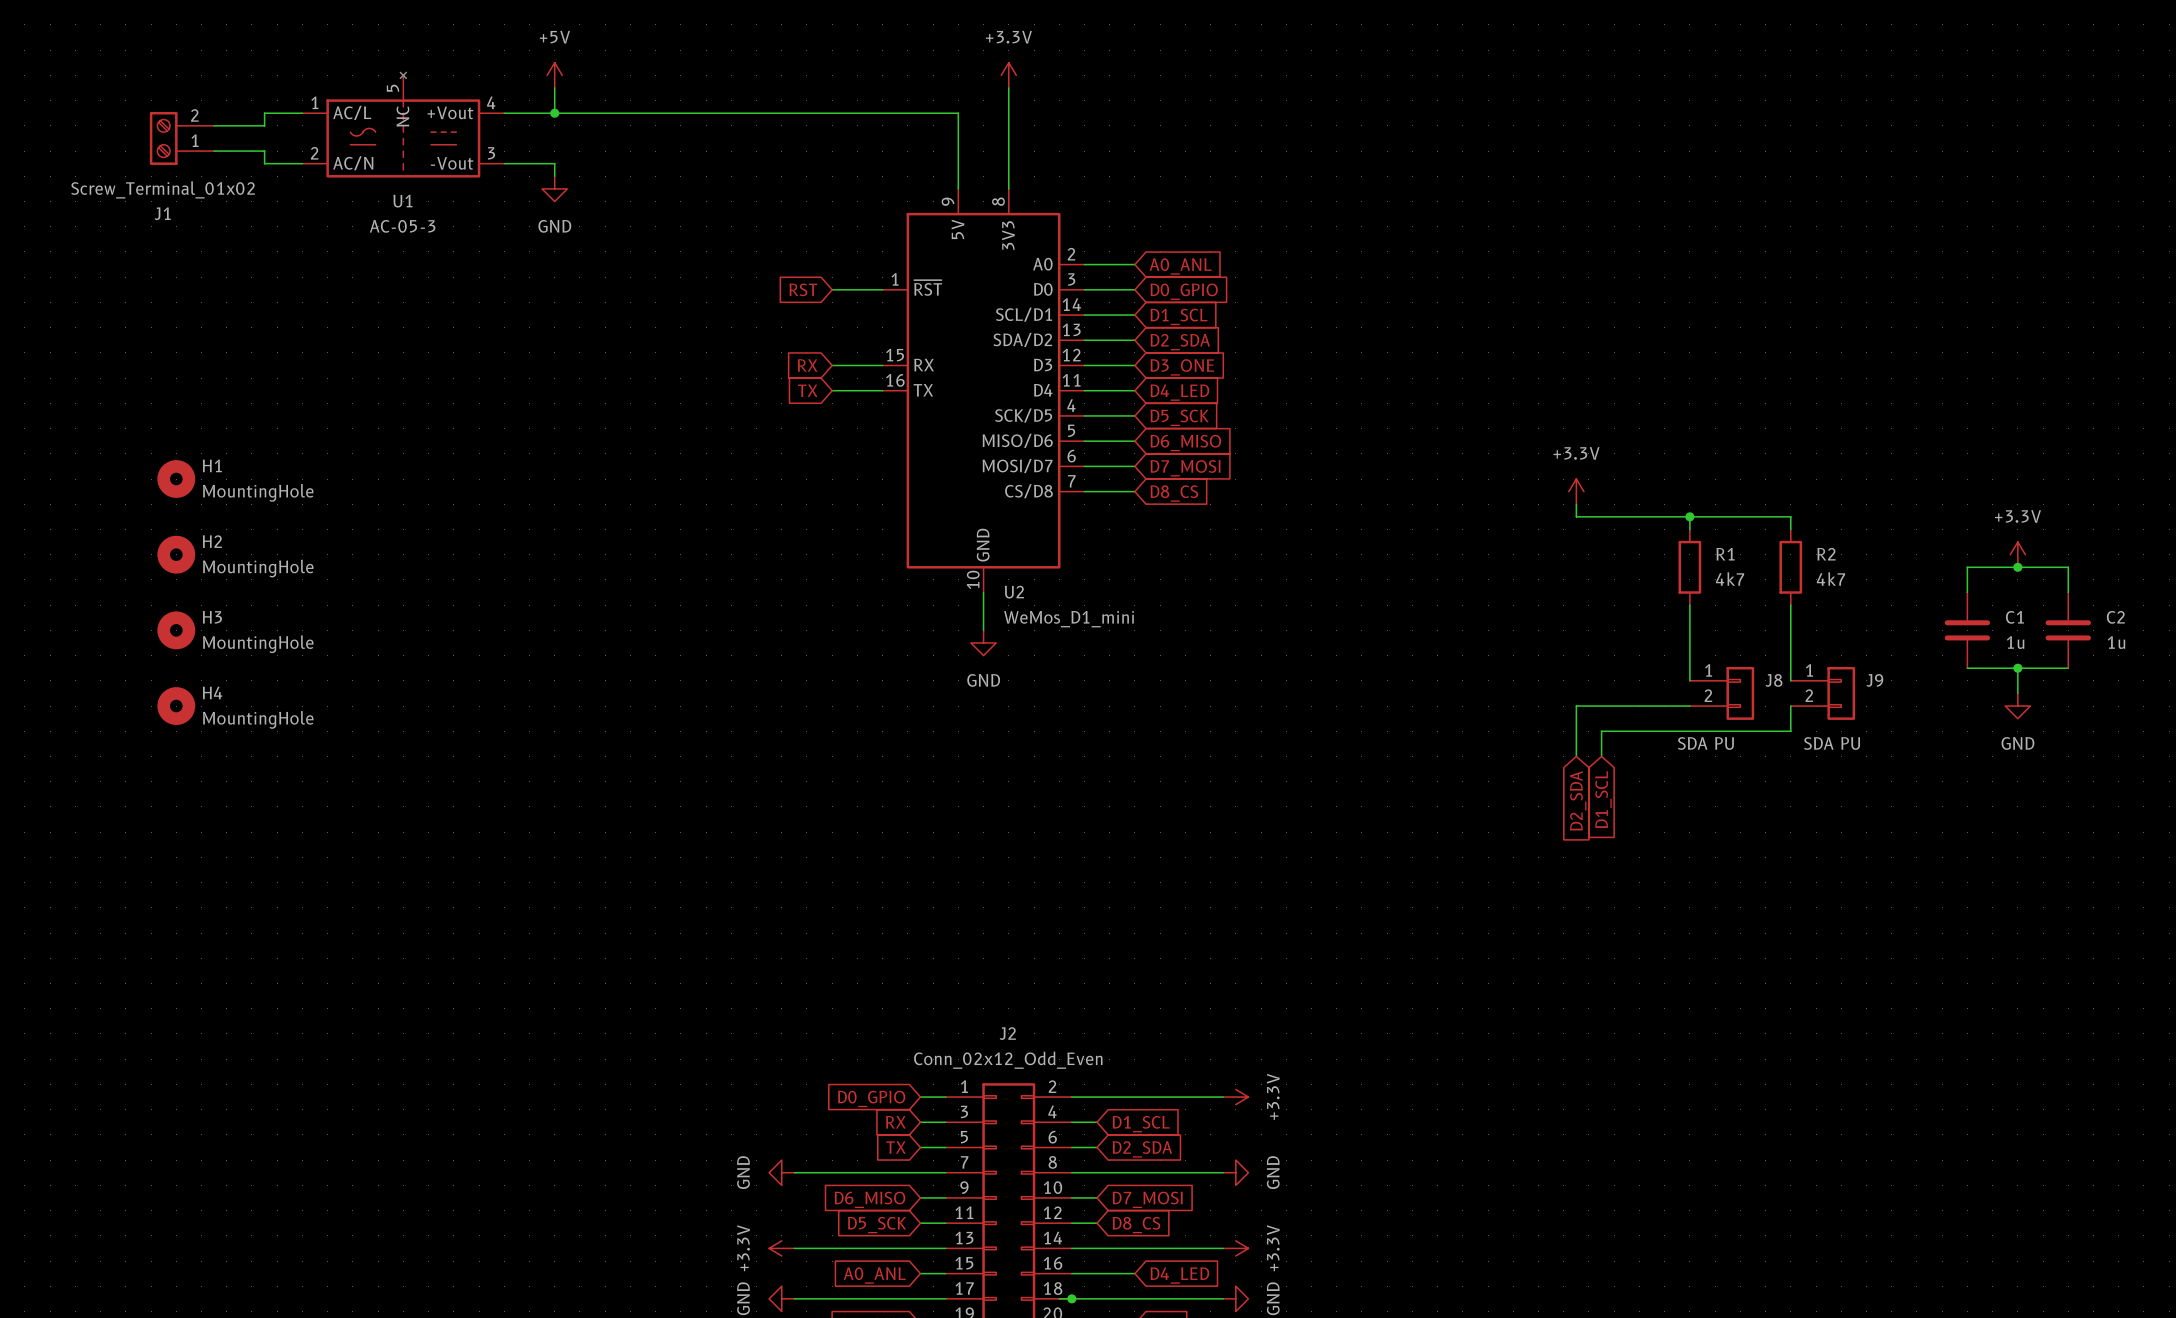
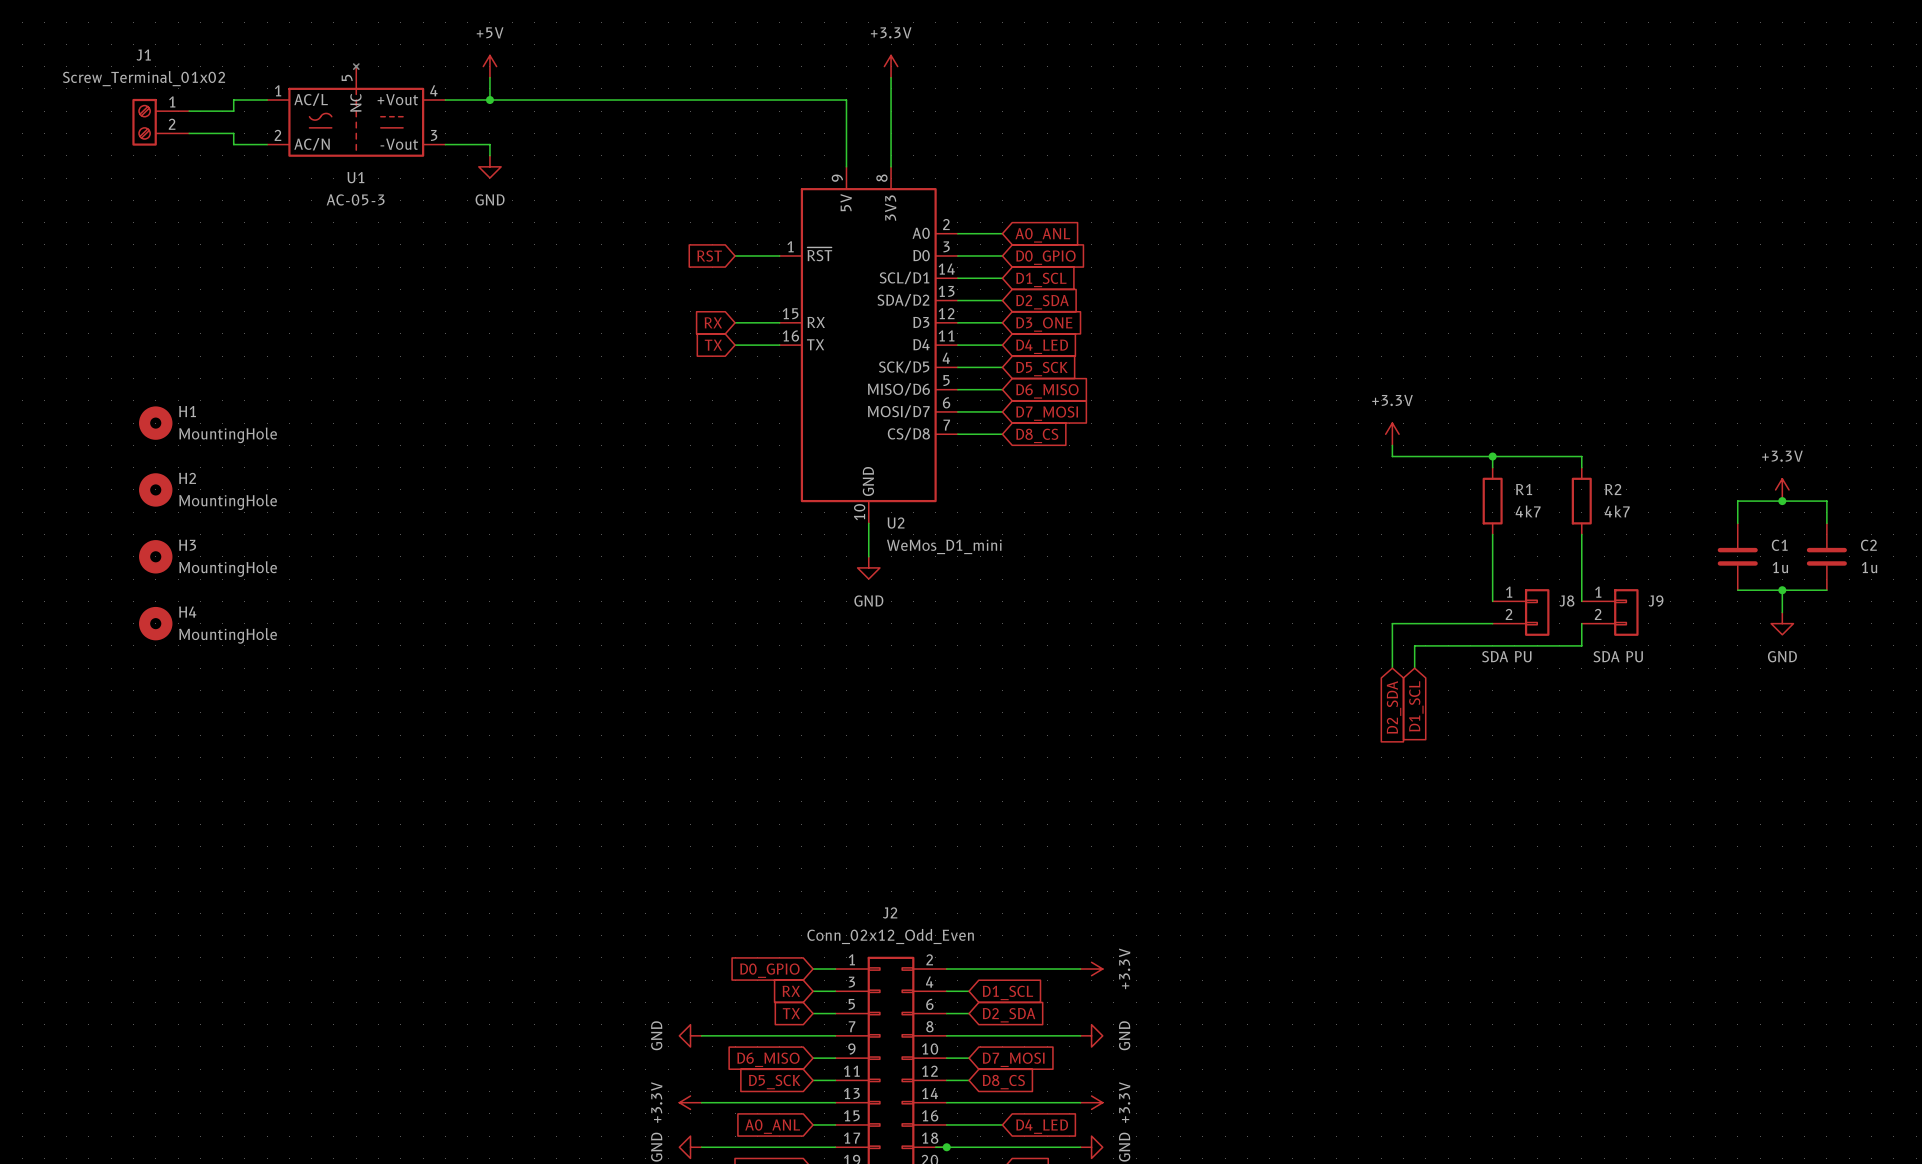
J1 flip: as is (163, 138) -> up-down (144, 122)

